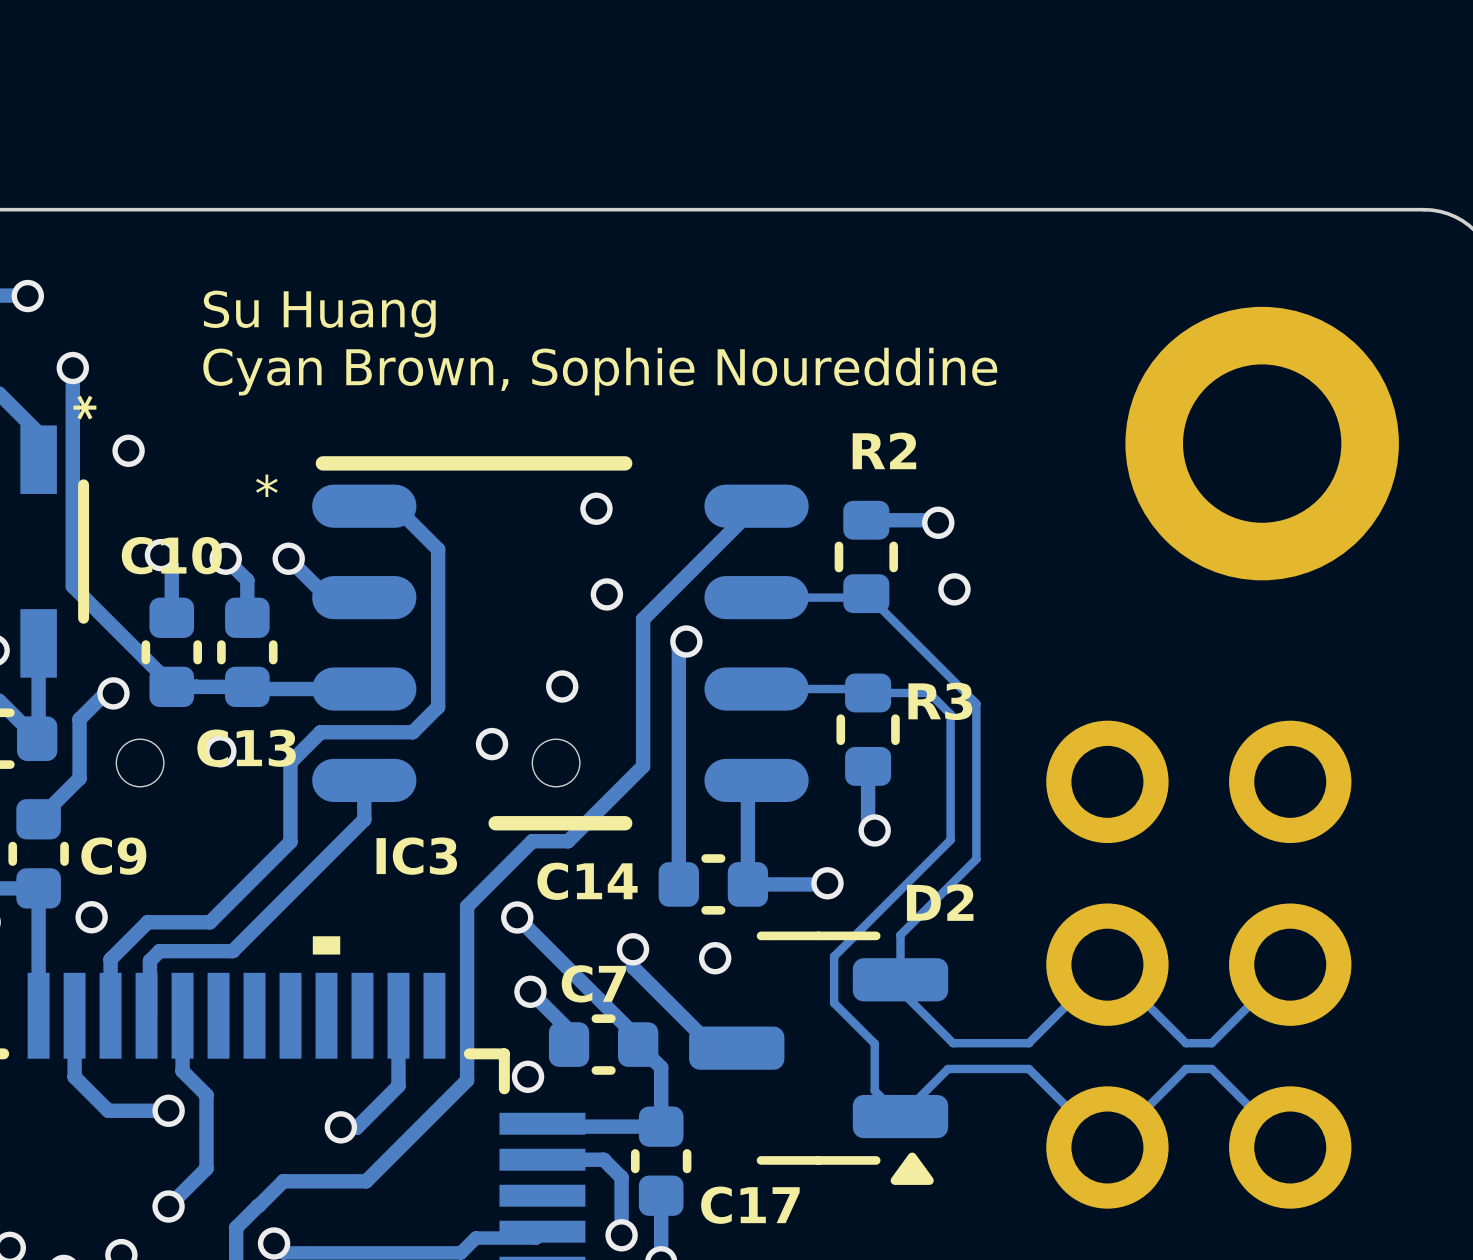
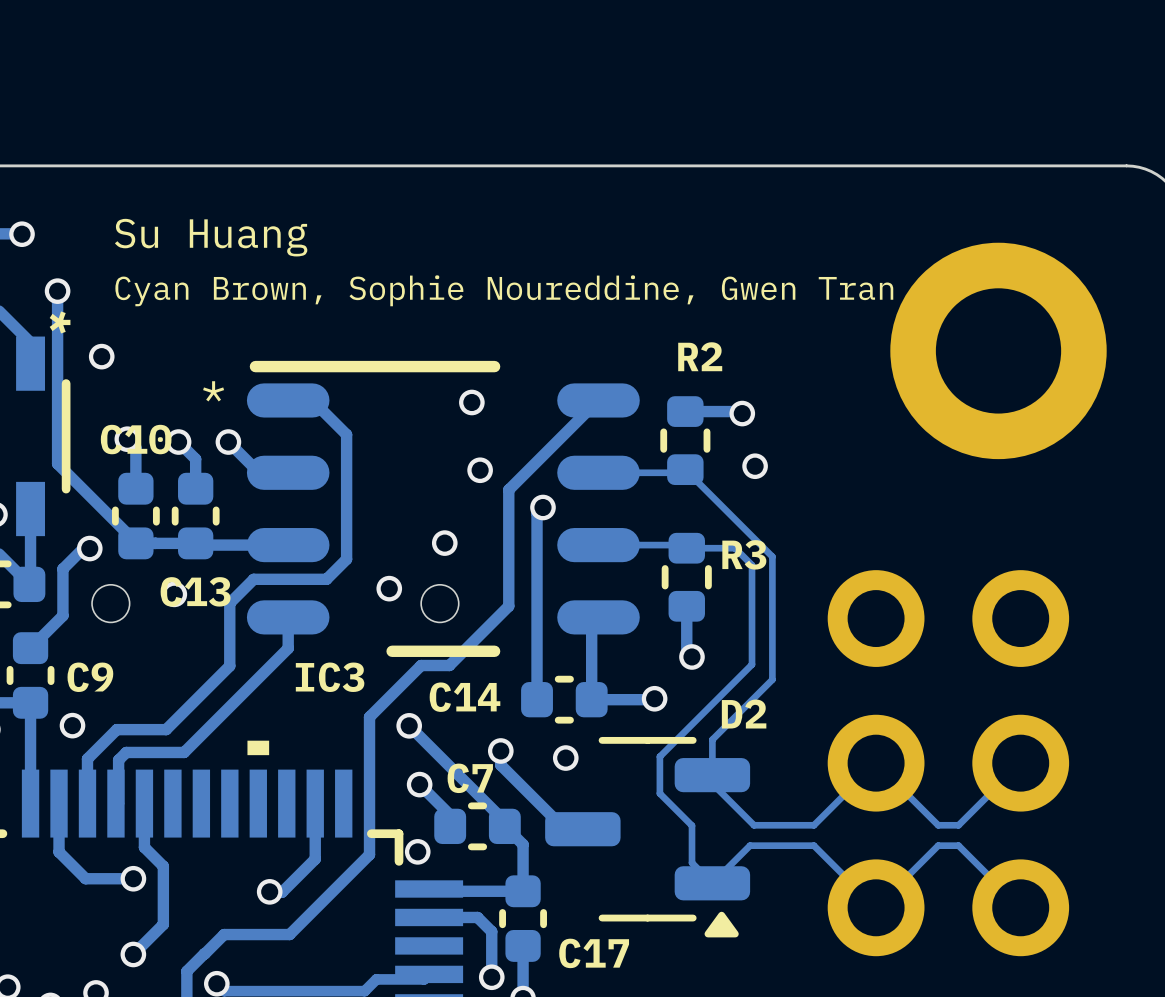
text position: Su Huang (319, 314) -> Su Huang (211, 237)
text: Cyan Brown, Sophie Noureddine (600, 371) -> Cyan Brown, Sophie Noureddine, Gwen Tran (504, 290)

